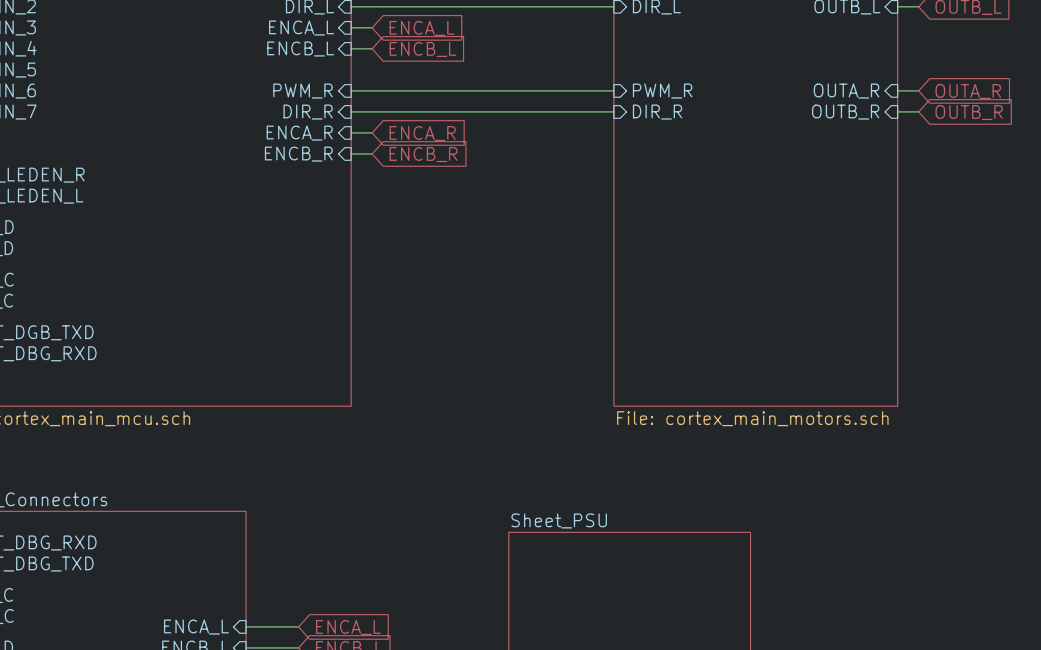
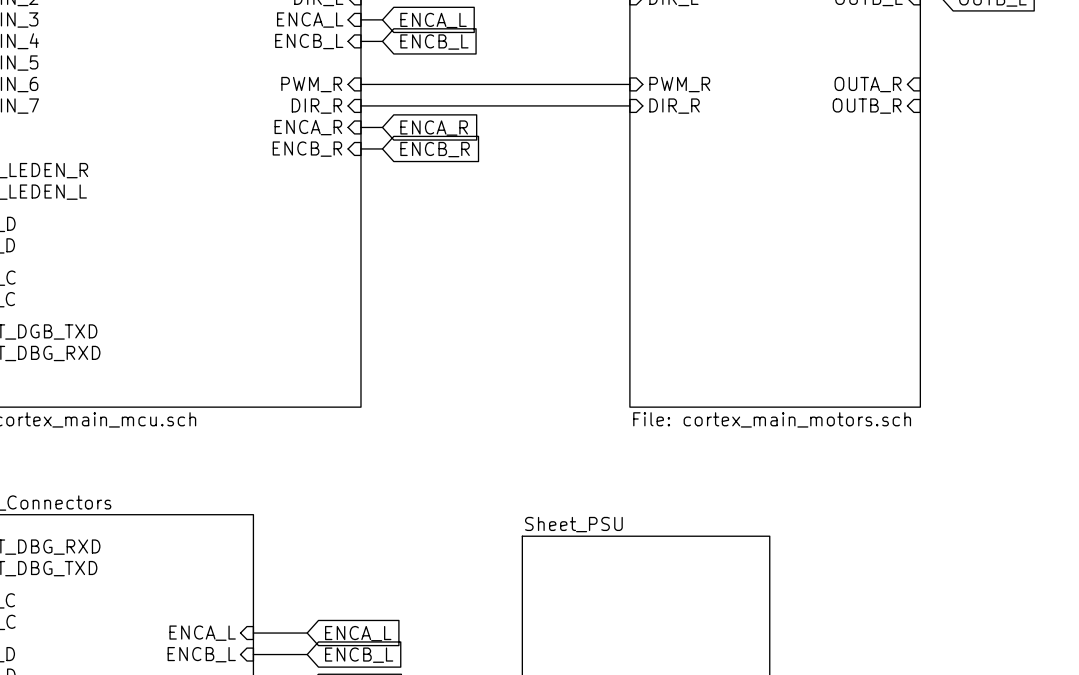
wire: (897, 90) (918, 90) -> none
global label: OUTA_R (968, 91) -> none
wire: (897, 111) (918, 111) -> none
global label: OUTB_R (969, 112) -> none

